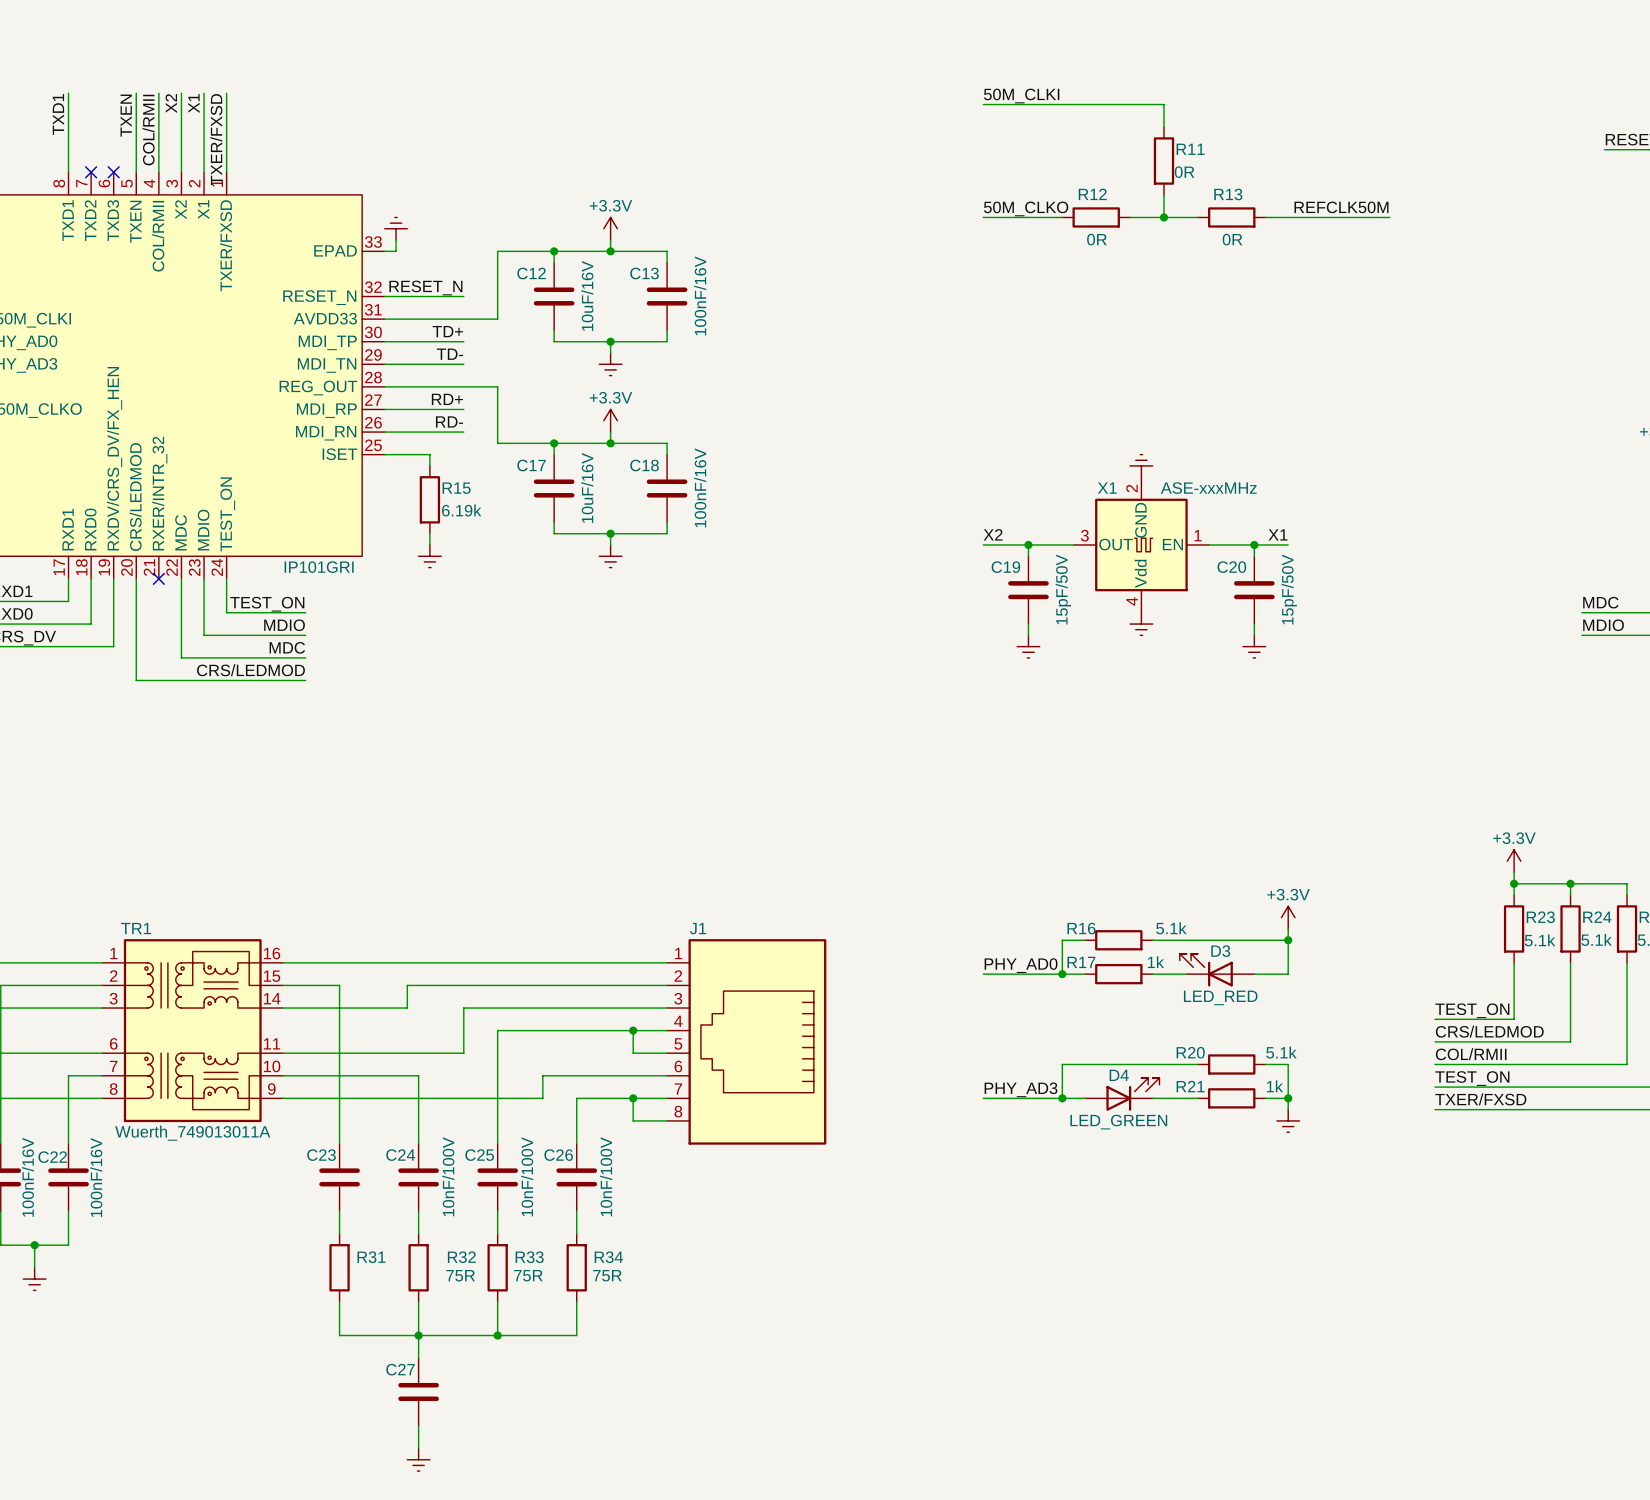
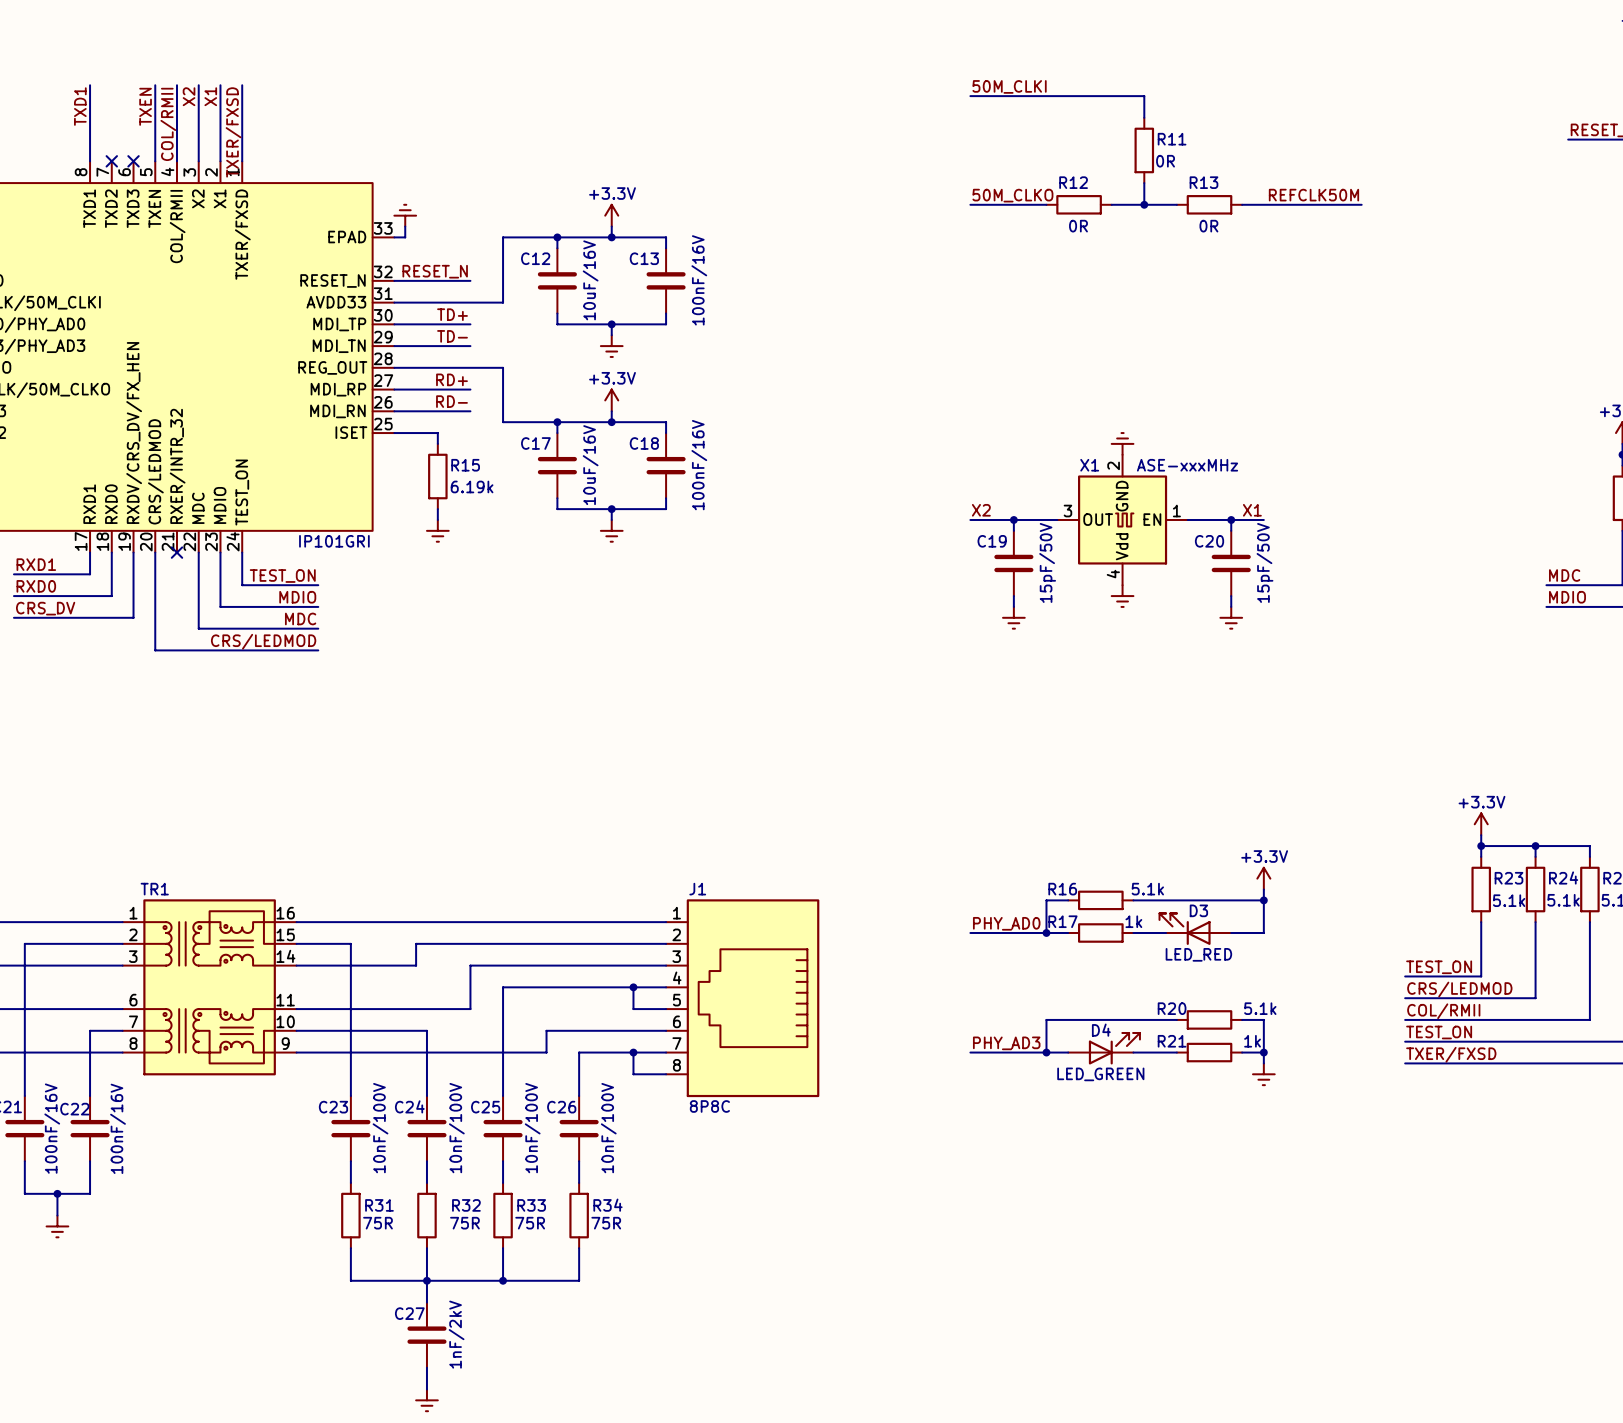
TR1 value: Wuerth_749013011A (192, 1133) -> none
J1 value: none -> 8P8C (709, 1106)
C23 value: none -> 10nF/100V (380, 1128)
R31 value: none -> 75R (377, 1223)
C27 value: none -> 1nF/2kV (456, 1334)

